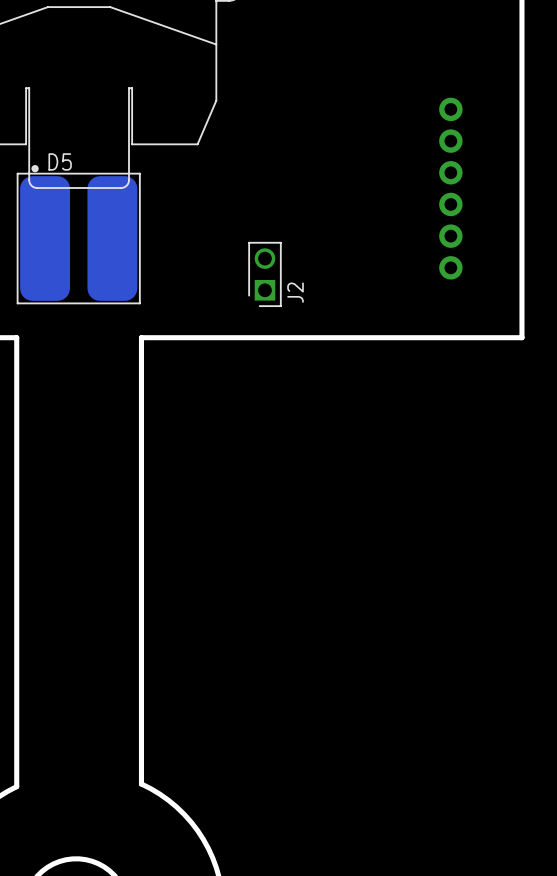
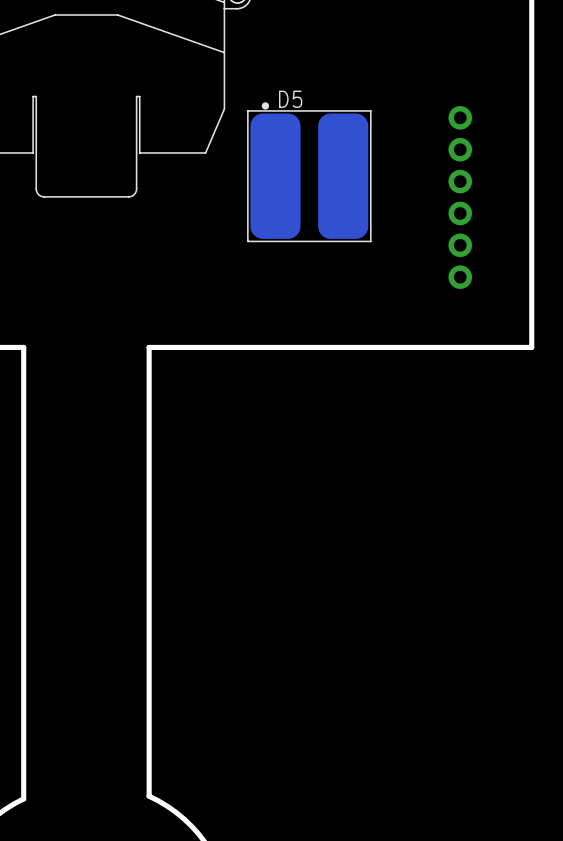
D5 position: (78, 234) -> (309, 172)
J2: (264, 274) -> none

